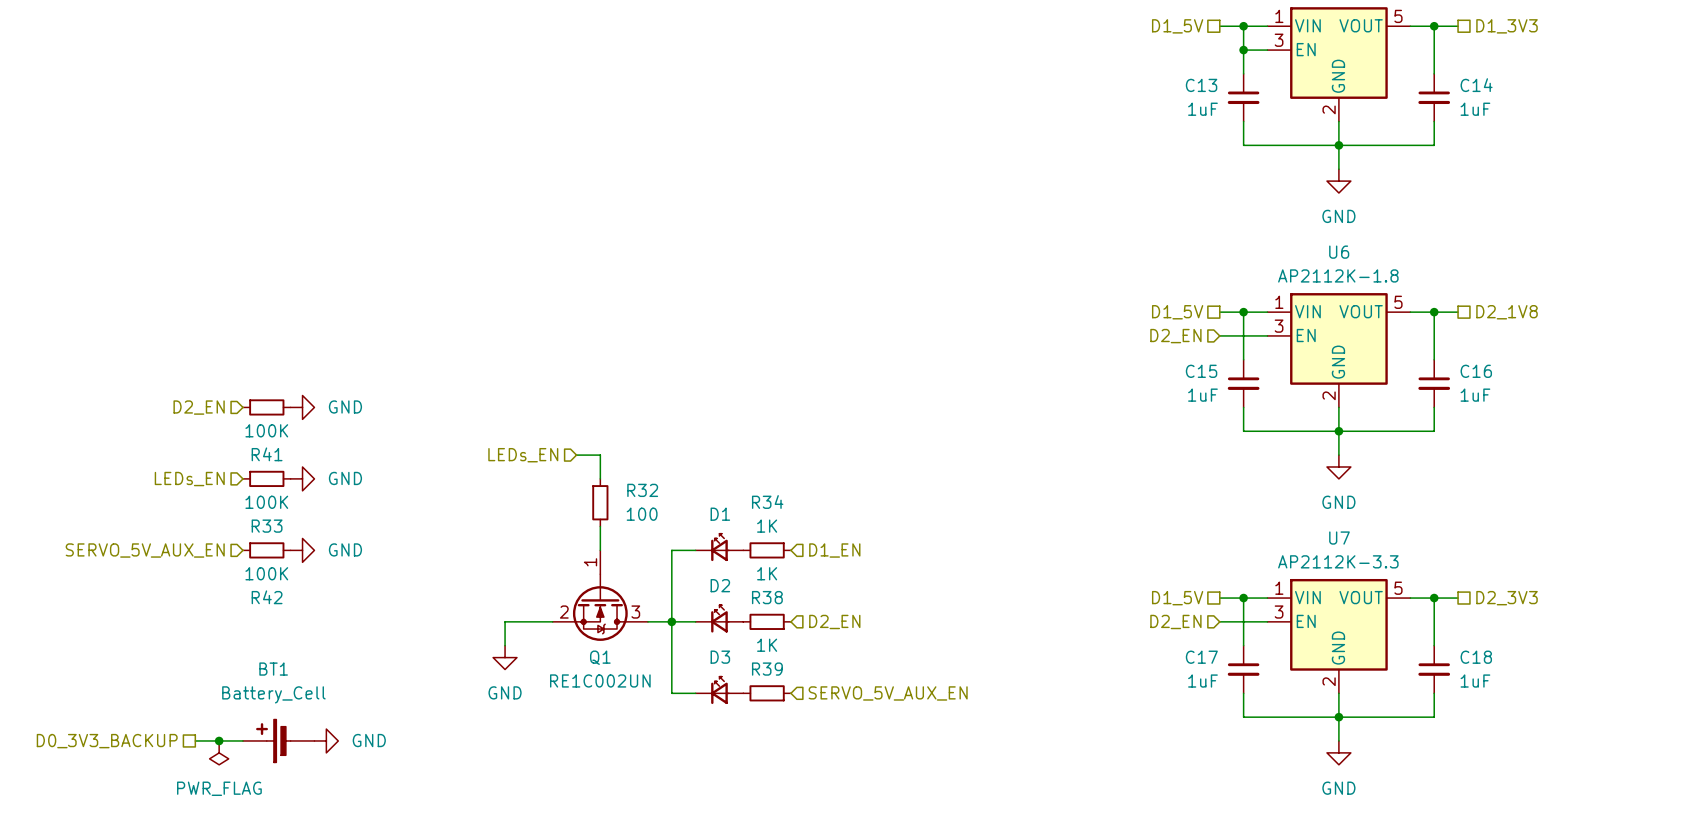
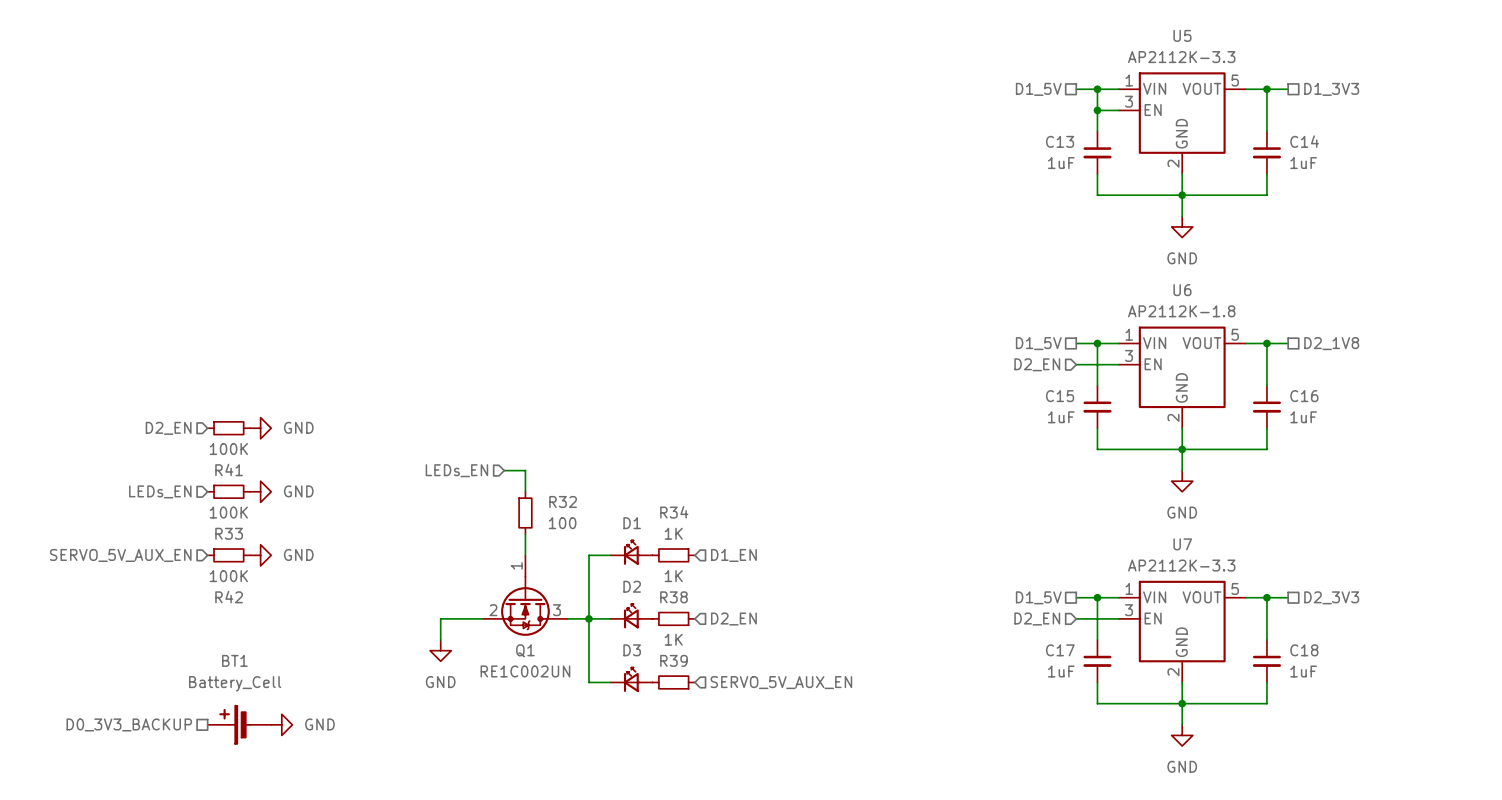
wire: (195, 740) (242, 740) -> none
junction: (219, 740) -> none
hierarchical label position: D0_3V3_BACKUP (107, 741) -> D0_3V3_BACKUP (129, 724)
power symbol: PWR_FLAG (219, 752) -> none

